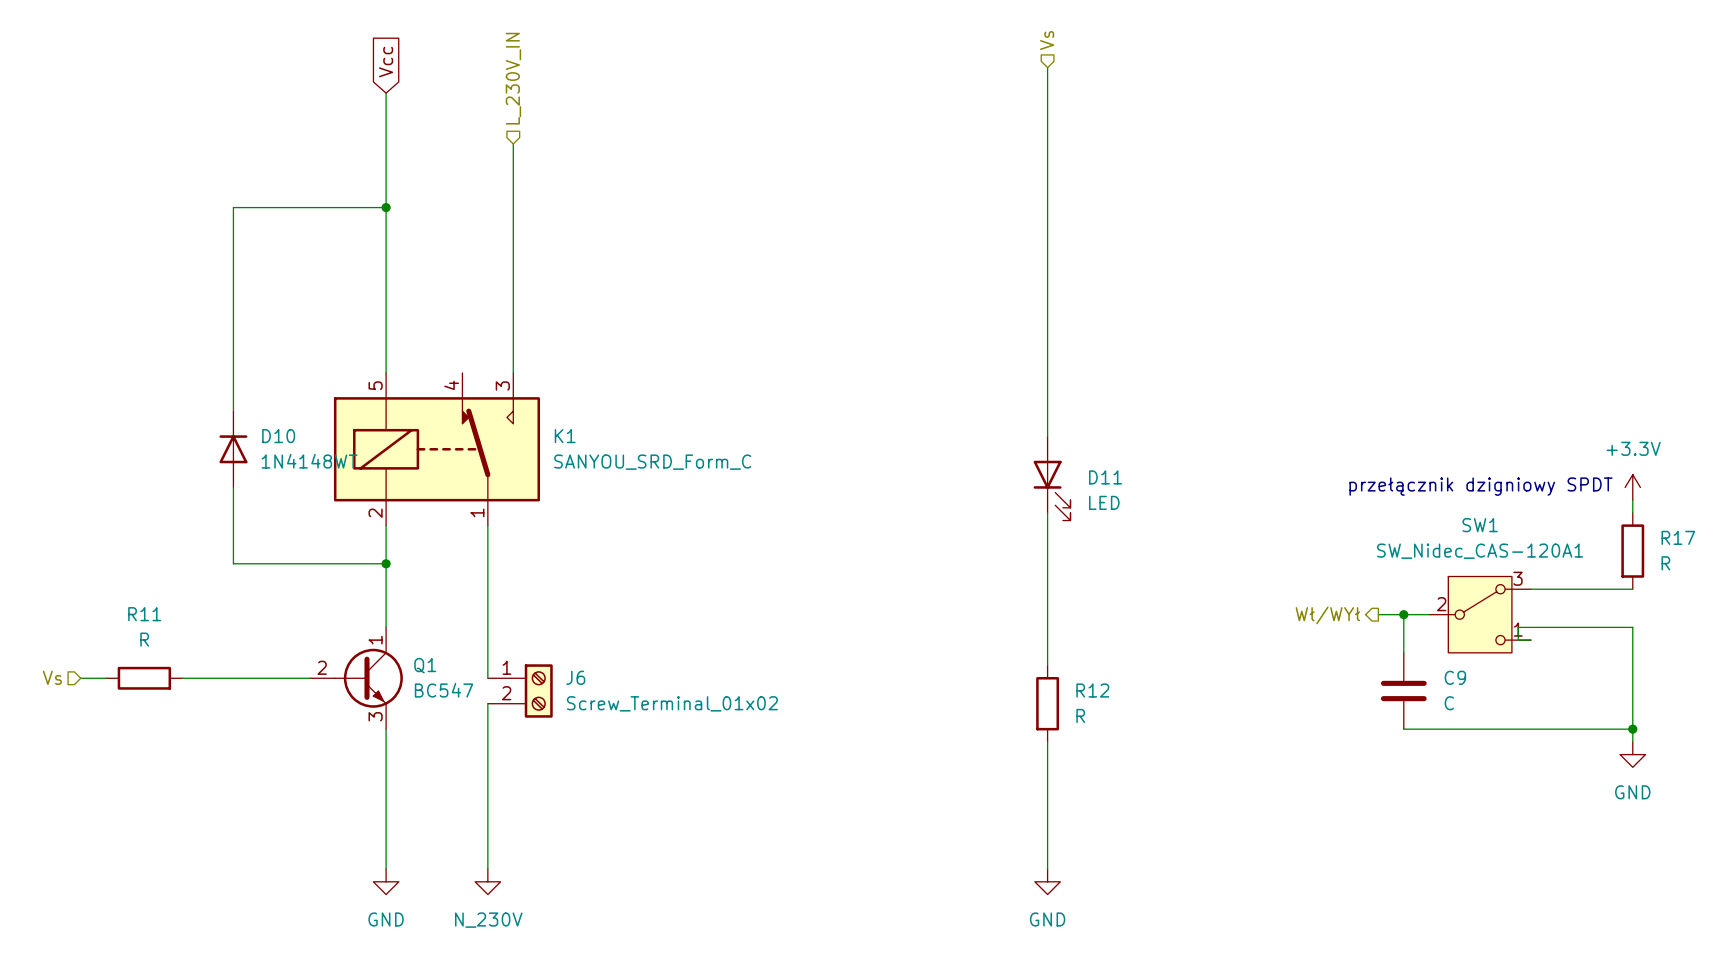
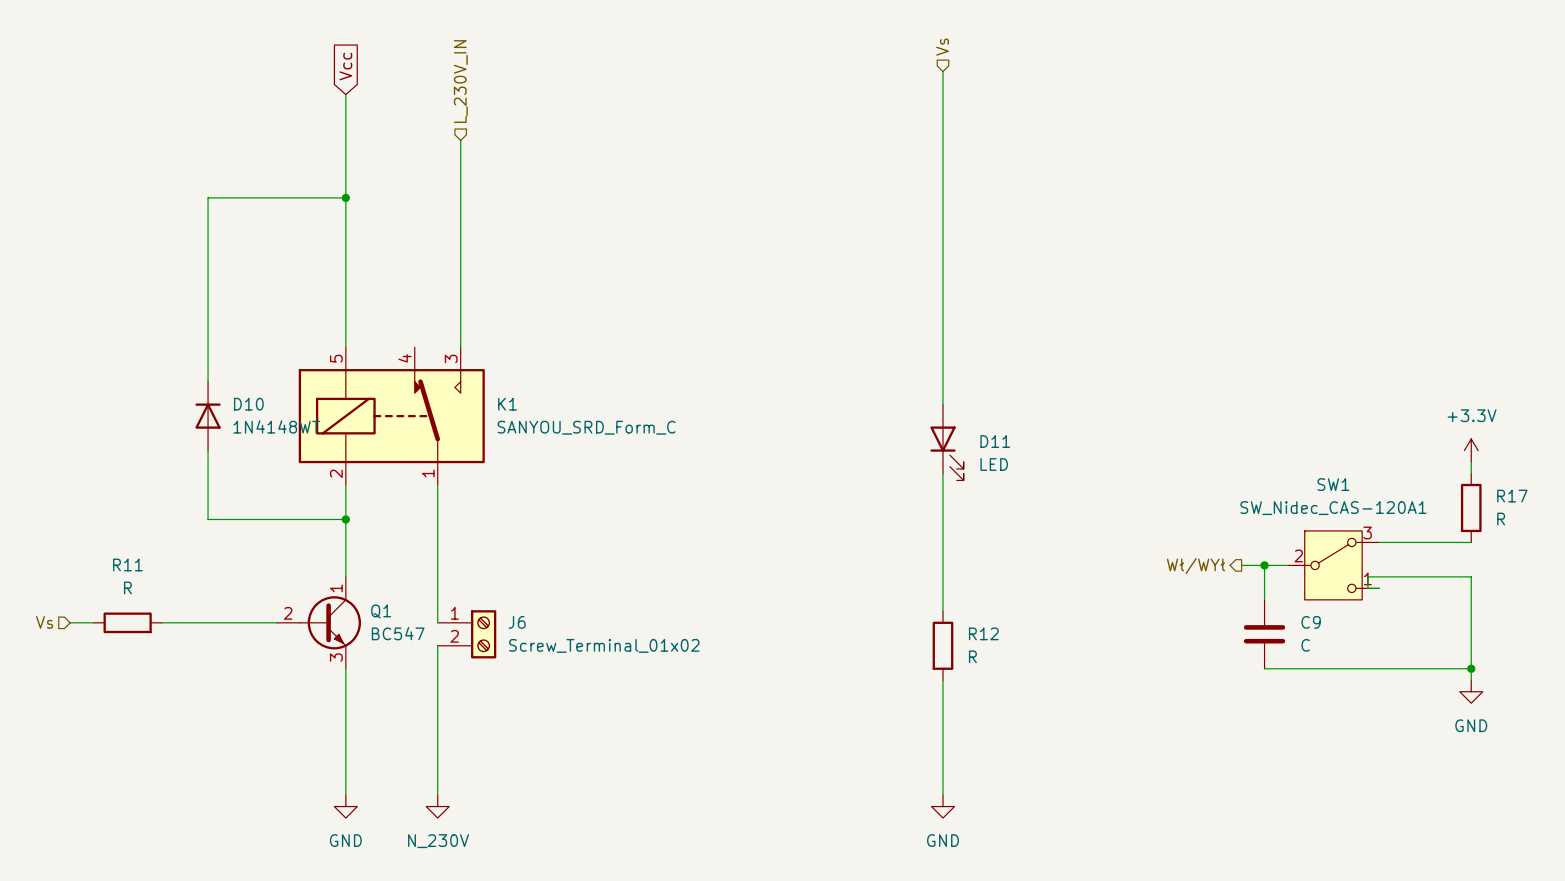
text: przełącznik dzigniowy SPDT (1481, 486) -> none

